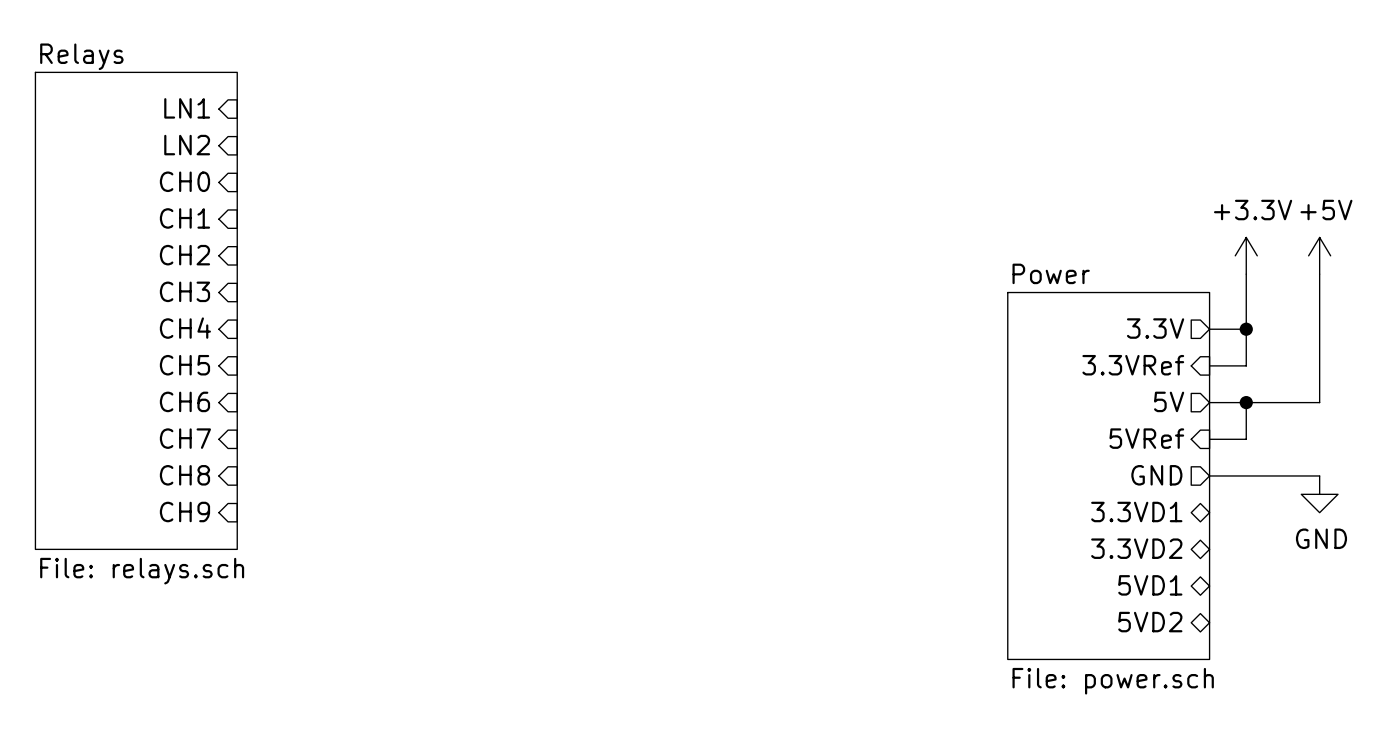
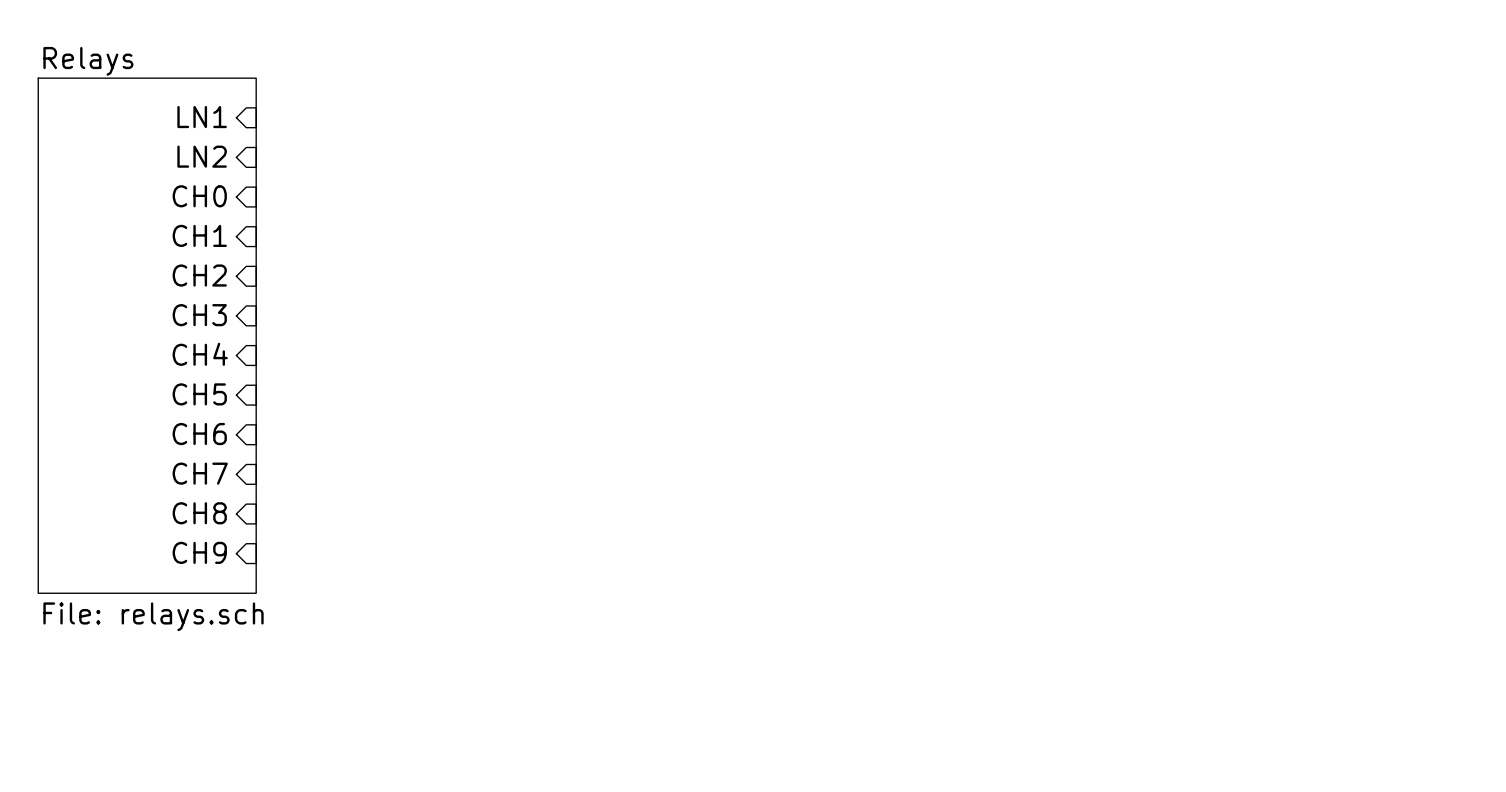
power symbol: +3.3V (1246, 255) -> none
power symbol: +5V (1319, 255) -> none
wire: (1246, 274) (1246, 365) (1209, 365) -> none
wire: (1319, 274) (1319, 402) (1209, 402) -> none
sheet pin: 3.3V (1155, 328) -> none
wire: (1209, 329) (1246, 329) -> none
junction: (1246, 329) -> none
sheet pin: 3.3VRef (1133, 365) -> none
sheet pin: 5V (1169, 401) -> none
wire: (1246, 402) (1246, 439) (1209, 439) -> none
junction: (1246, 402) -> none
sheet pin: 5VRef (1146, 438) -> none
sheet Power: File: power.sch (1108, 475) -> none
sheet pin: GND (1156, 475) -> none
wire: (1209, 475) (1319, 475) -> none
power symbol: GND (1319, 494) -> none
sheet pin: 3.3VD1 (1136, 511) -> none
sheet pin: 3.3VD2 (1136, 548) -> none
sheet pin: 5VD1 (1150, 585) -> none
sheet pin: 5VD2 (1150, 622) -> none

